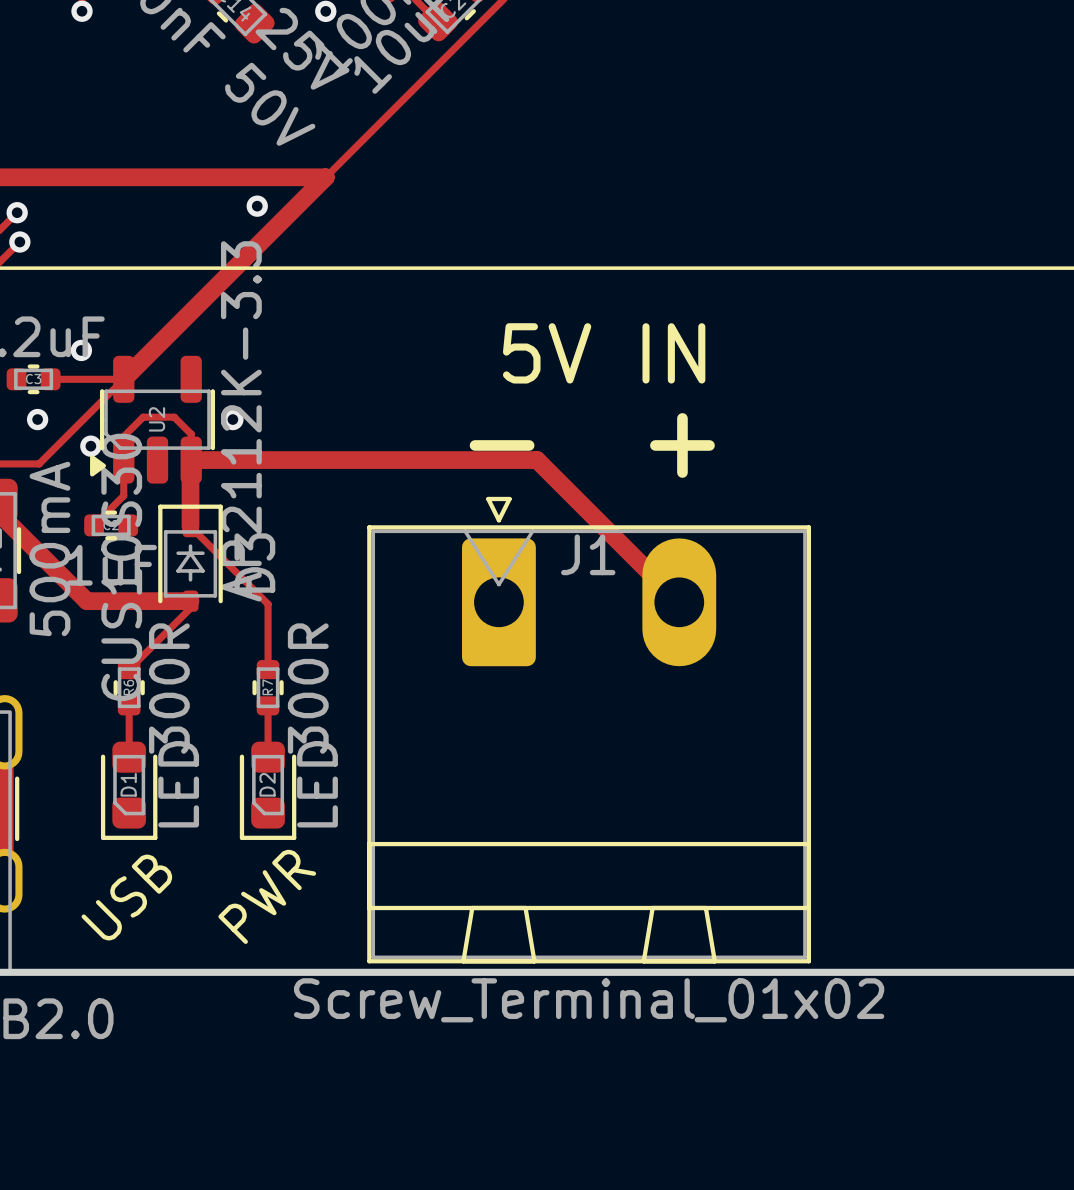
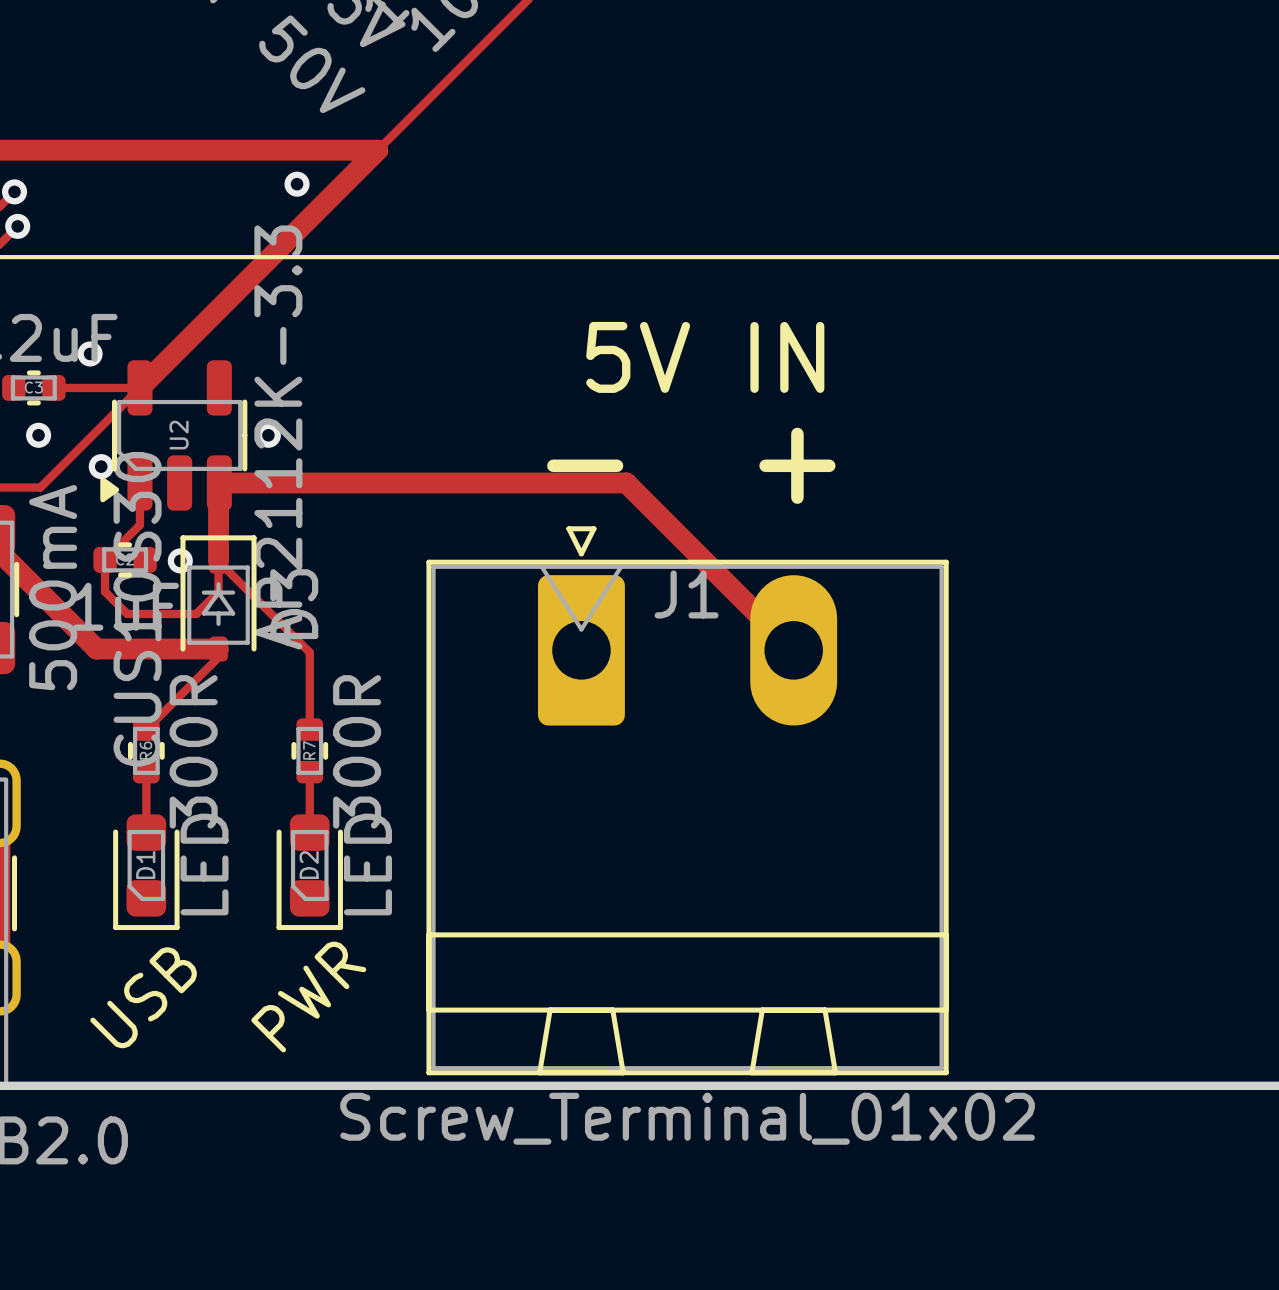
track: (123, 460) (123, 436) (143, 417) (174, 417) (191, 434) (191, 460) -> none
track: none -> (105, 559) (105, 591) (127, 613) (196, 613) (218, 591) (218, 561)
via: none -> (180, 560)

